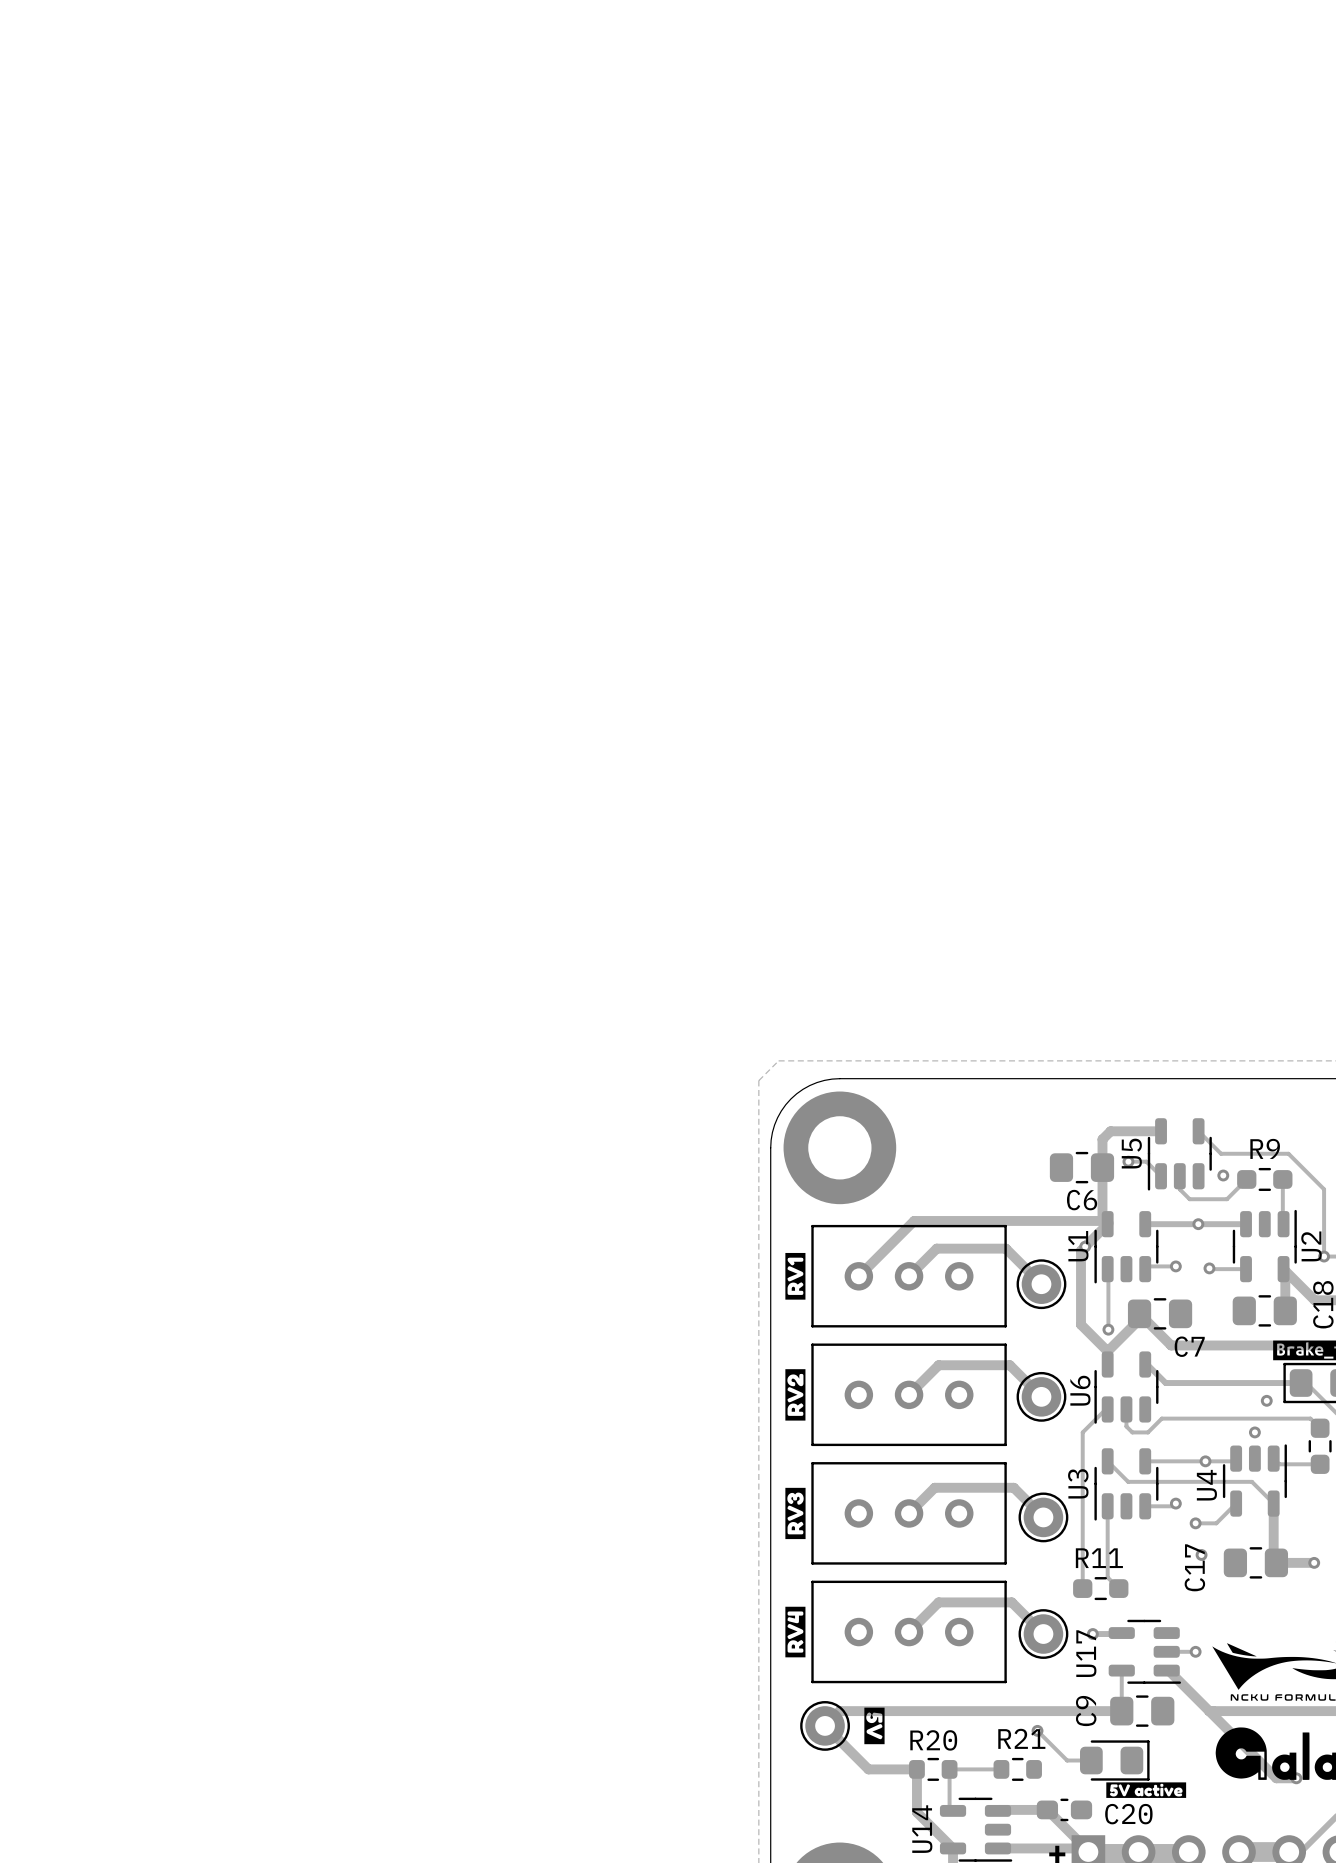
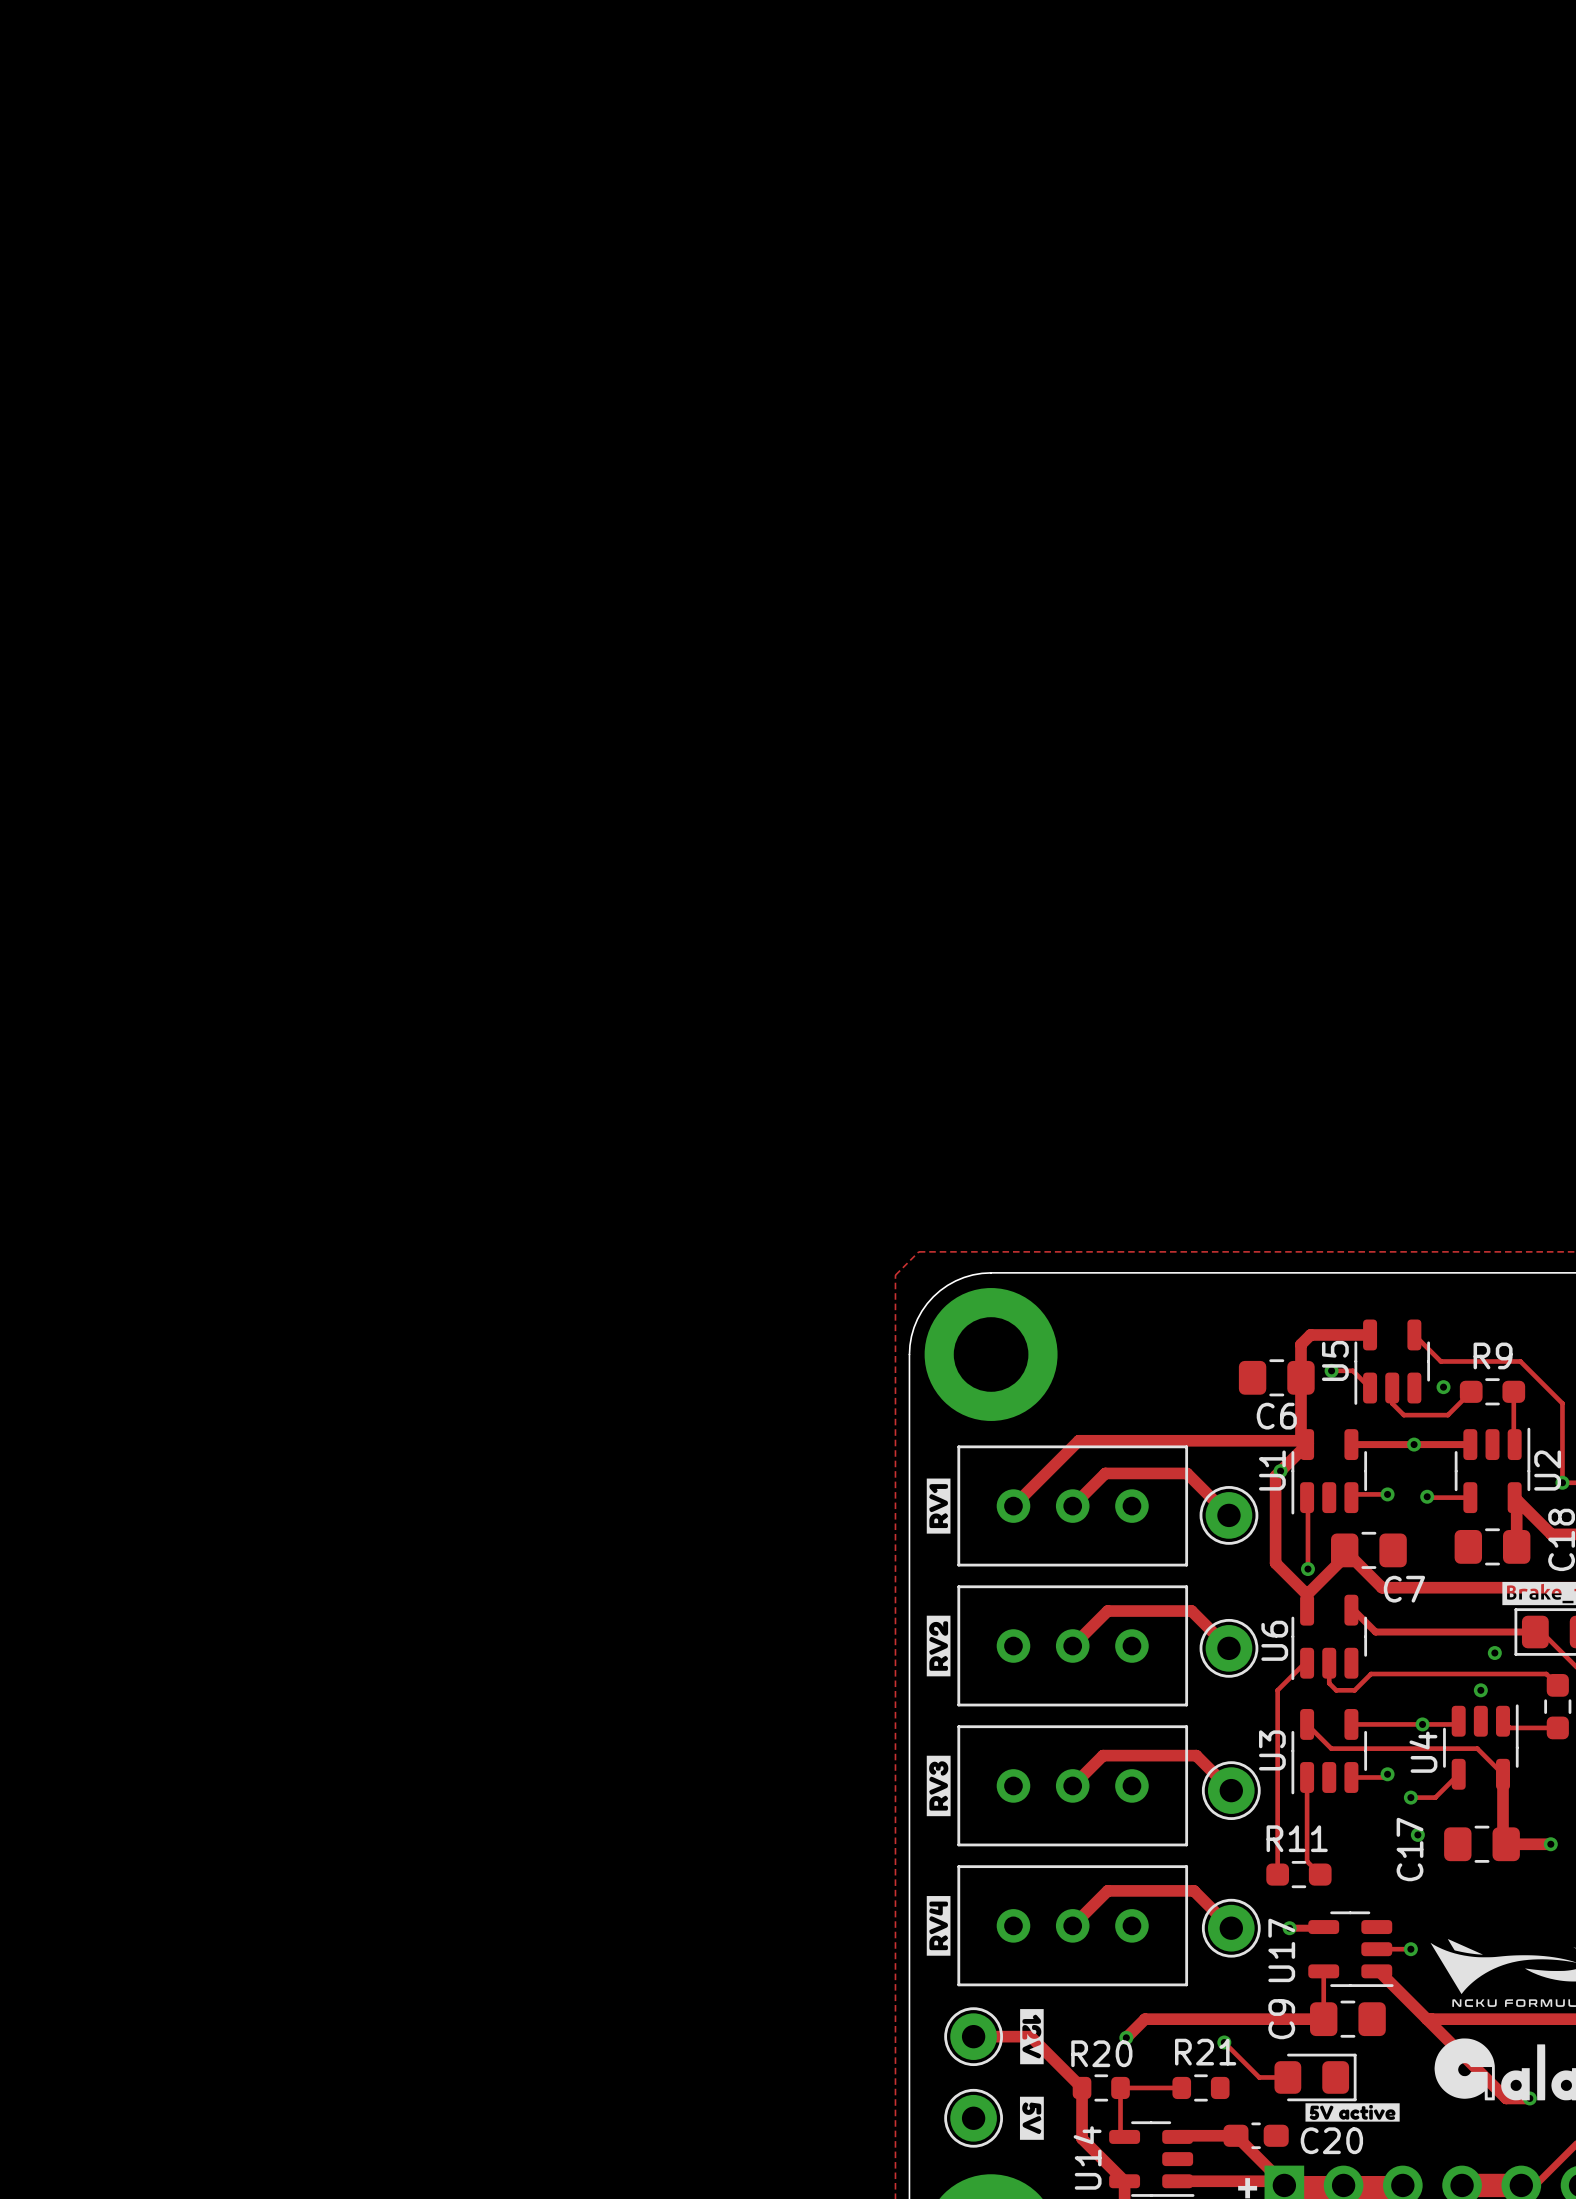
drawing: none -> [1020, 2009, 1044, 2065]
track: (970, 1711) (839, 1711) (825, 1725) (868, 1769) (916, 1769) -> (1145, 2019) (1126, 2037)
track: none -> (973, 2036) (1030, 2036) (1082, 2087)
drawing position: (874, 1725) -> (1031, 2118)
via: none -> (1126, 2037)
part: none -> (973, 2118)

